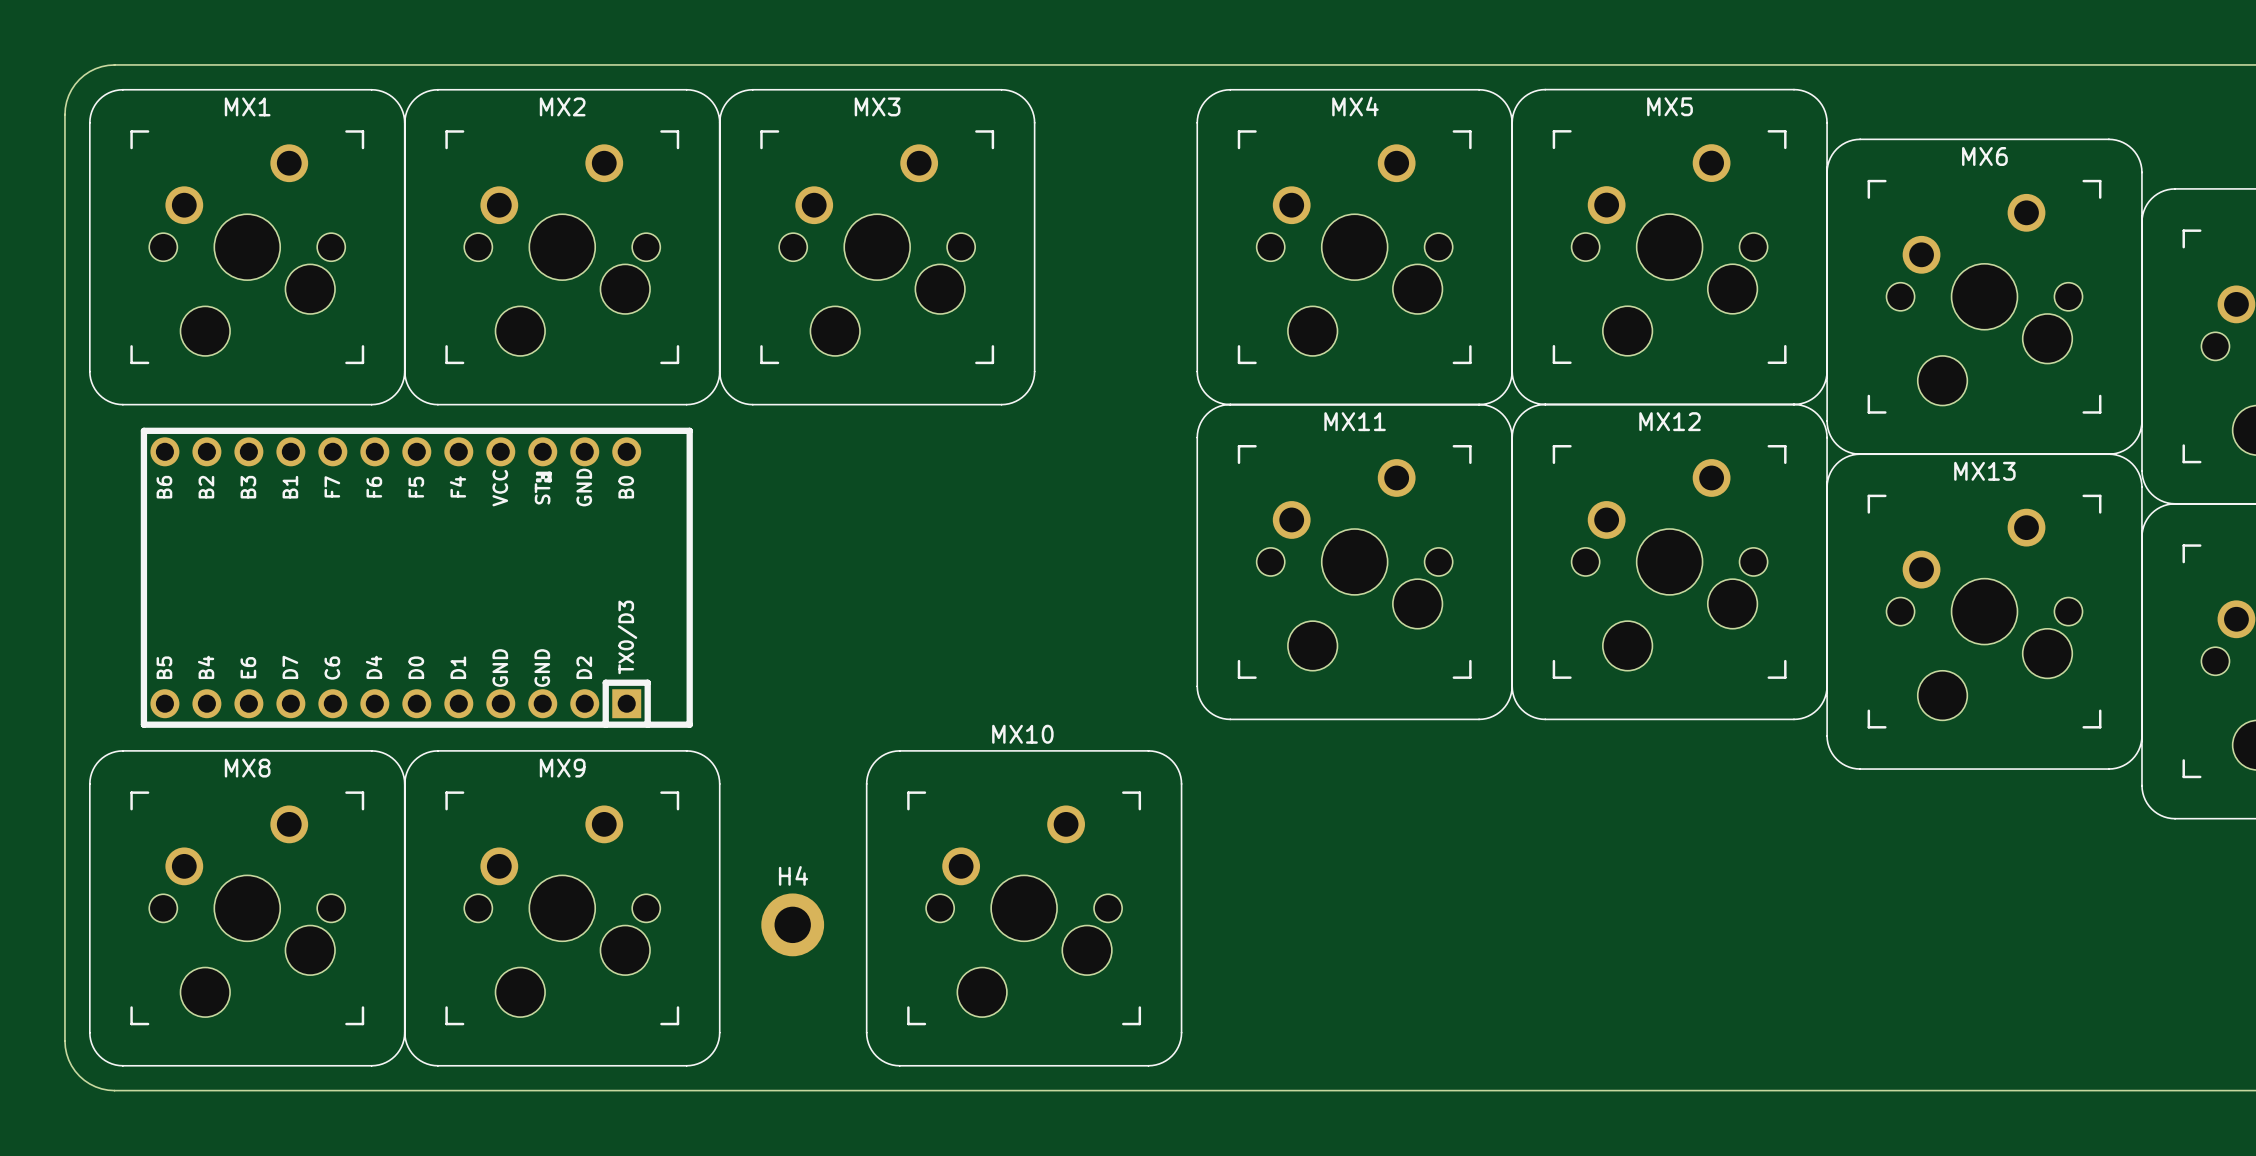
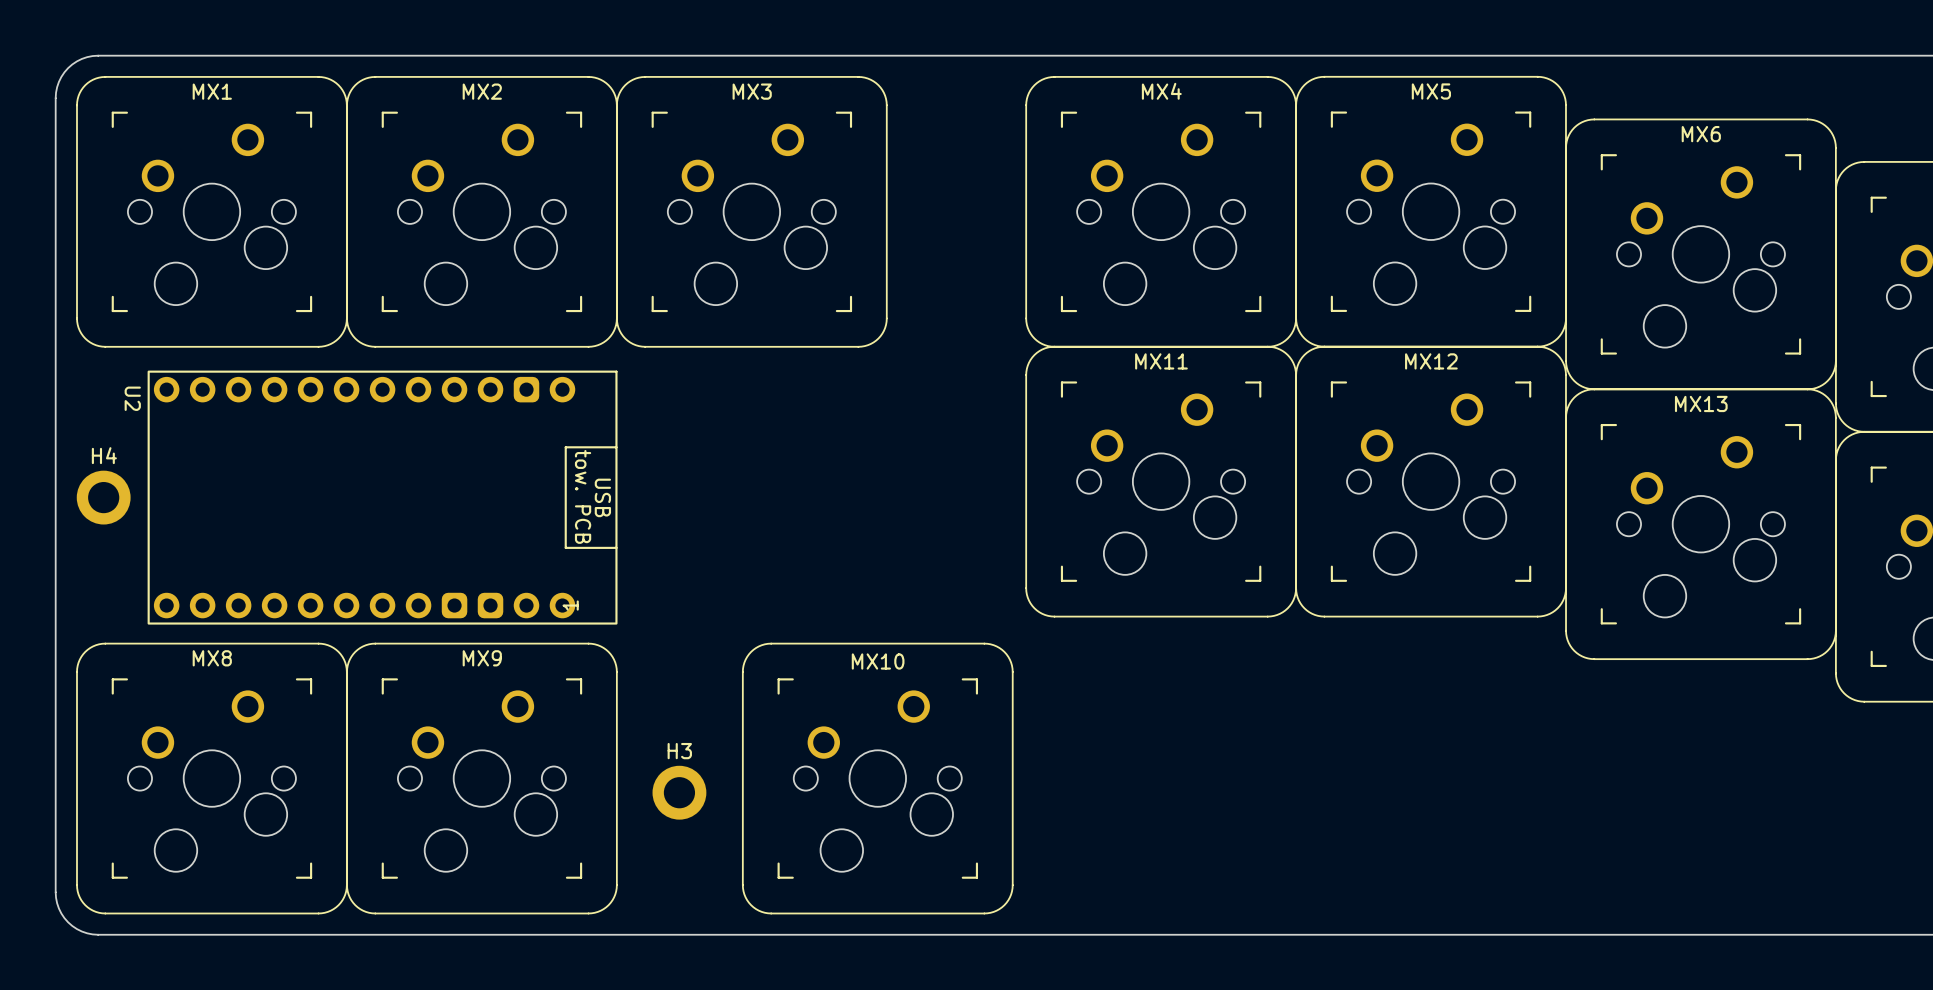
part: (416, 577) -> none
H4: none -> (103, 497)
U2: none -> (382, 497)
MX10 name position: MX10 (1022, 734) -> MX10 (878, 661)
H4 name: H4 (793, 875) -> H3 (679, 751)

